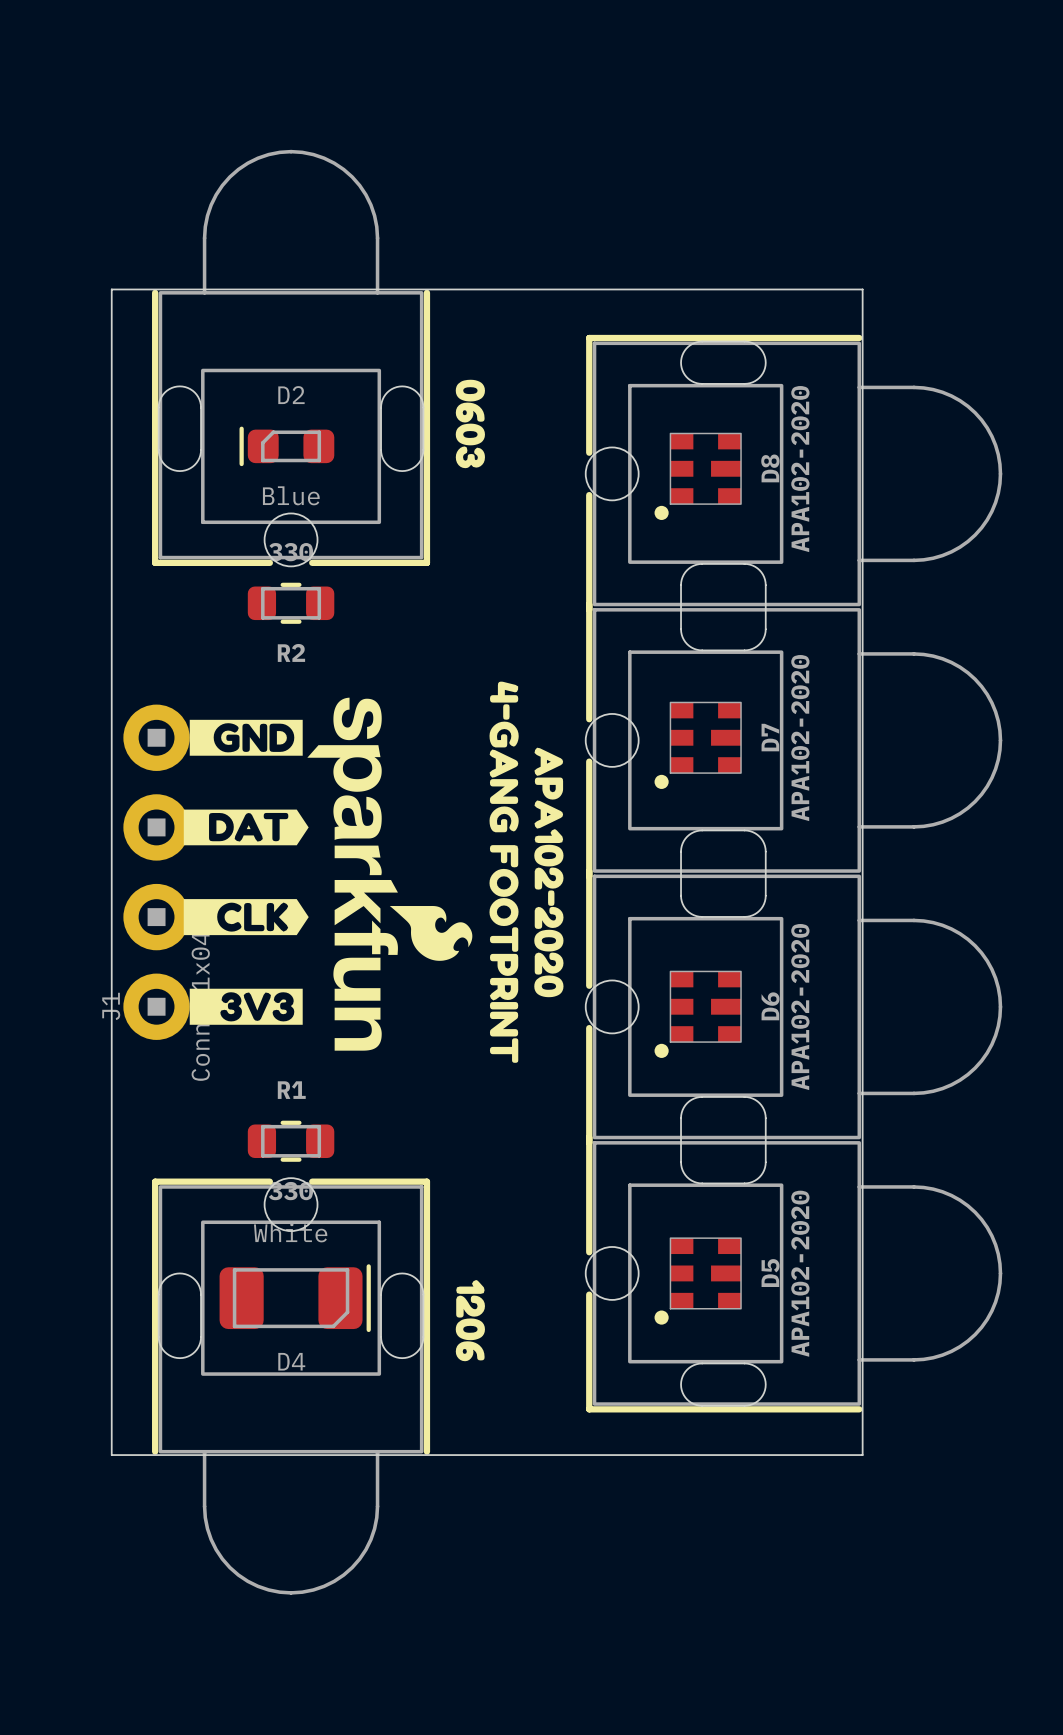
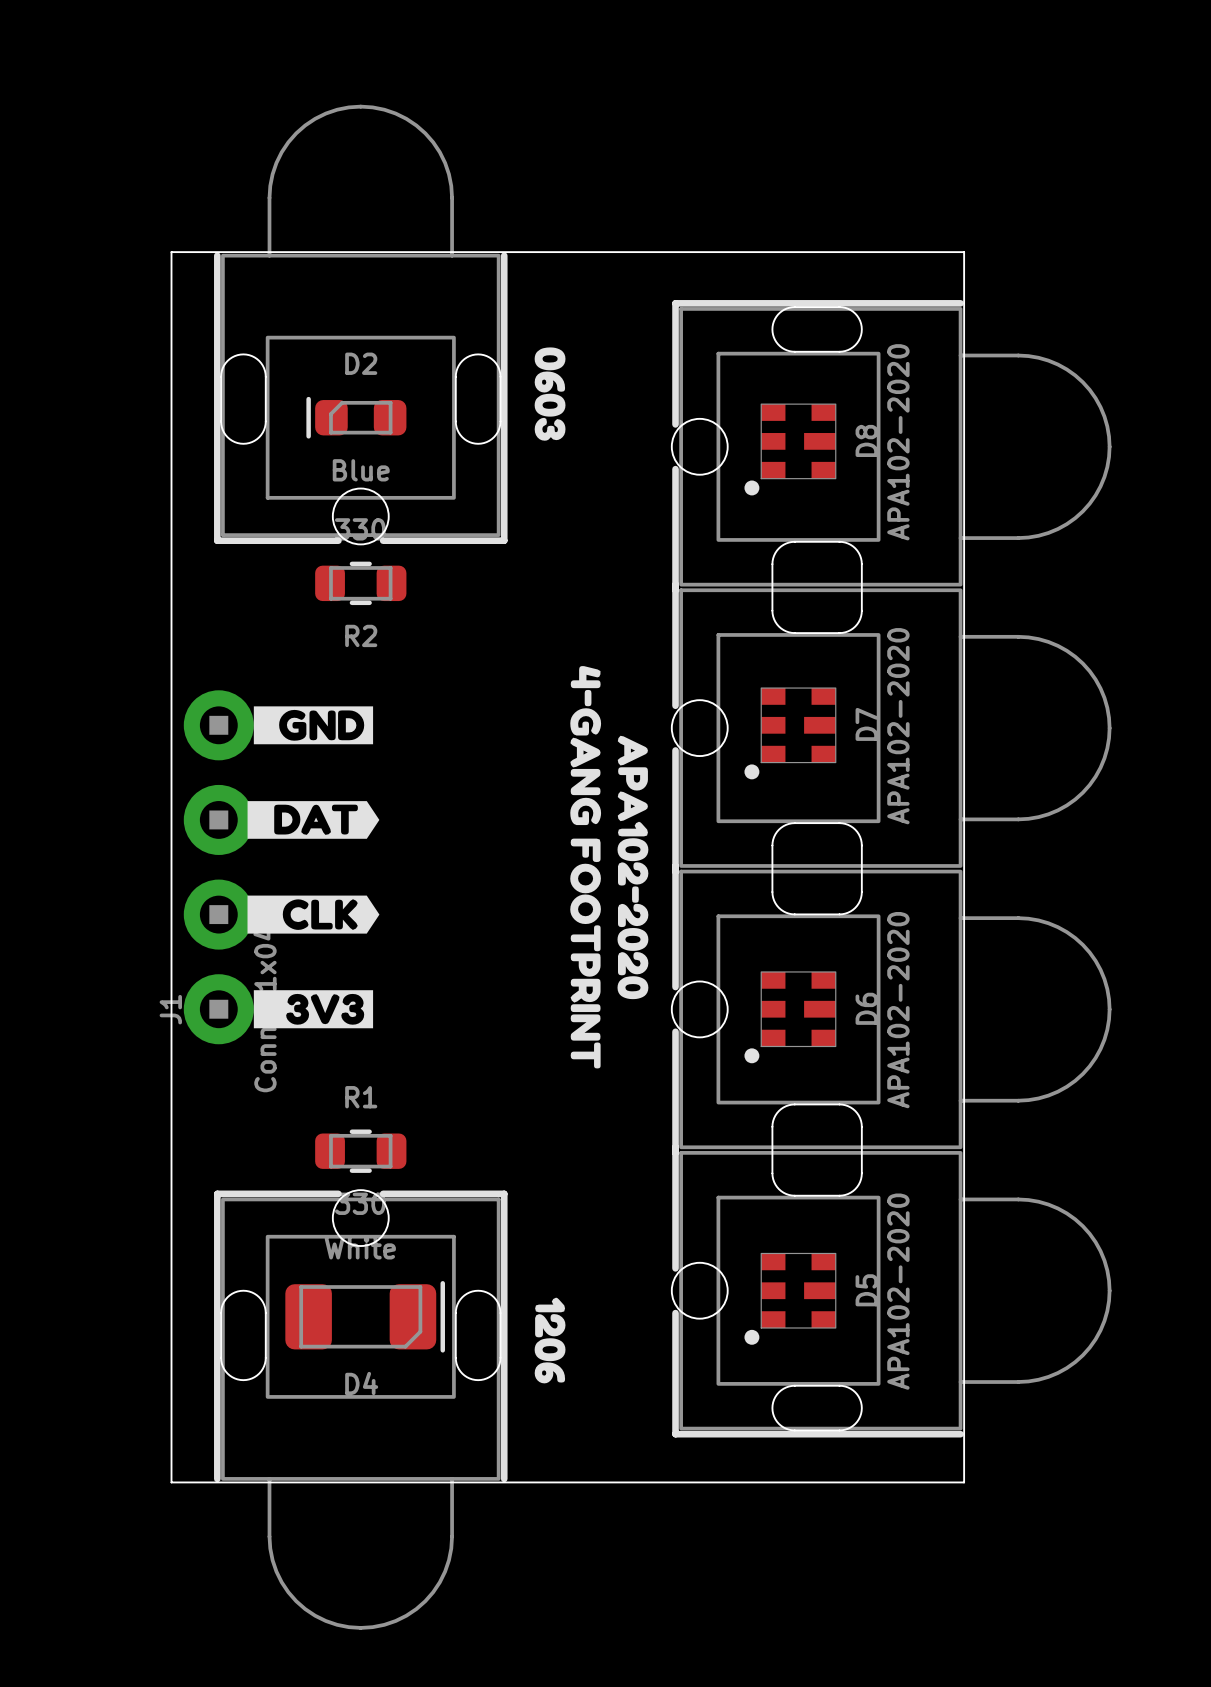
drawing: [307, 697, 473, 1051] -> none

